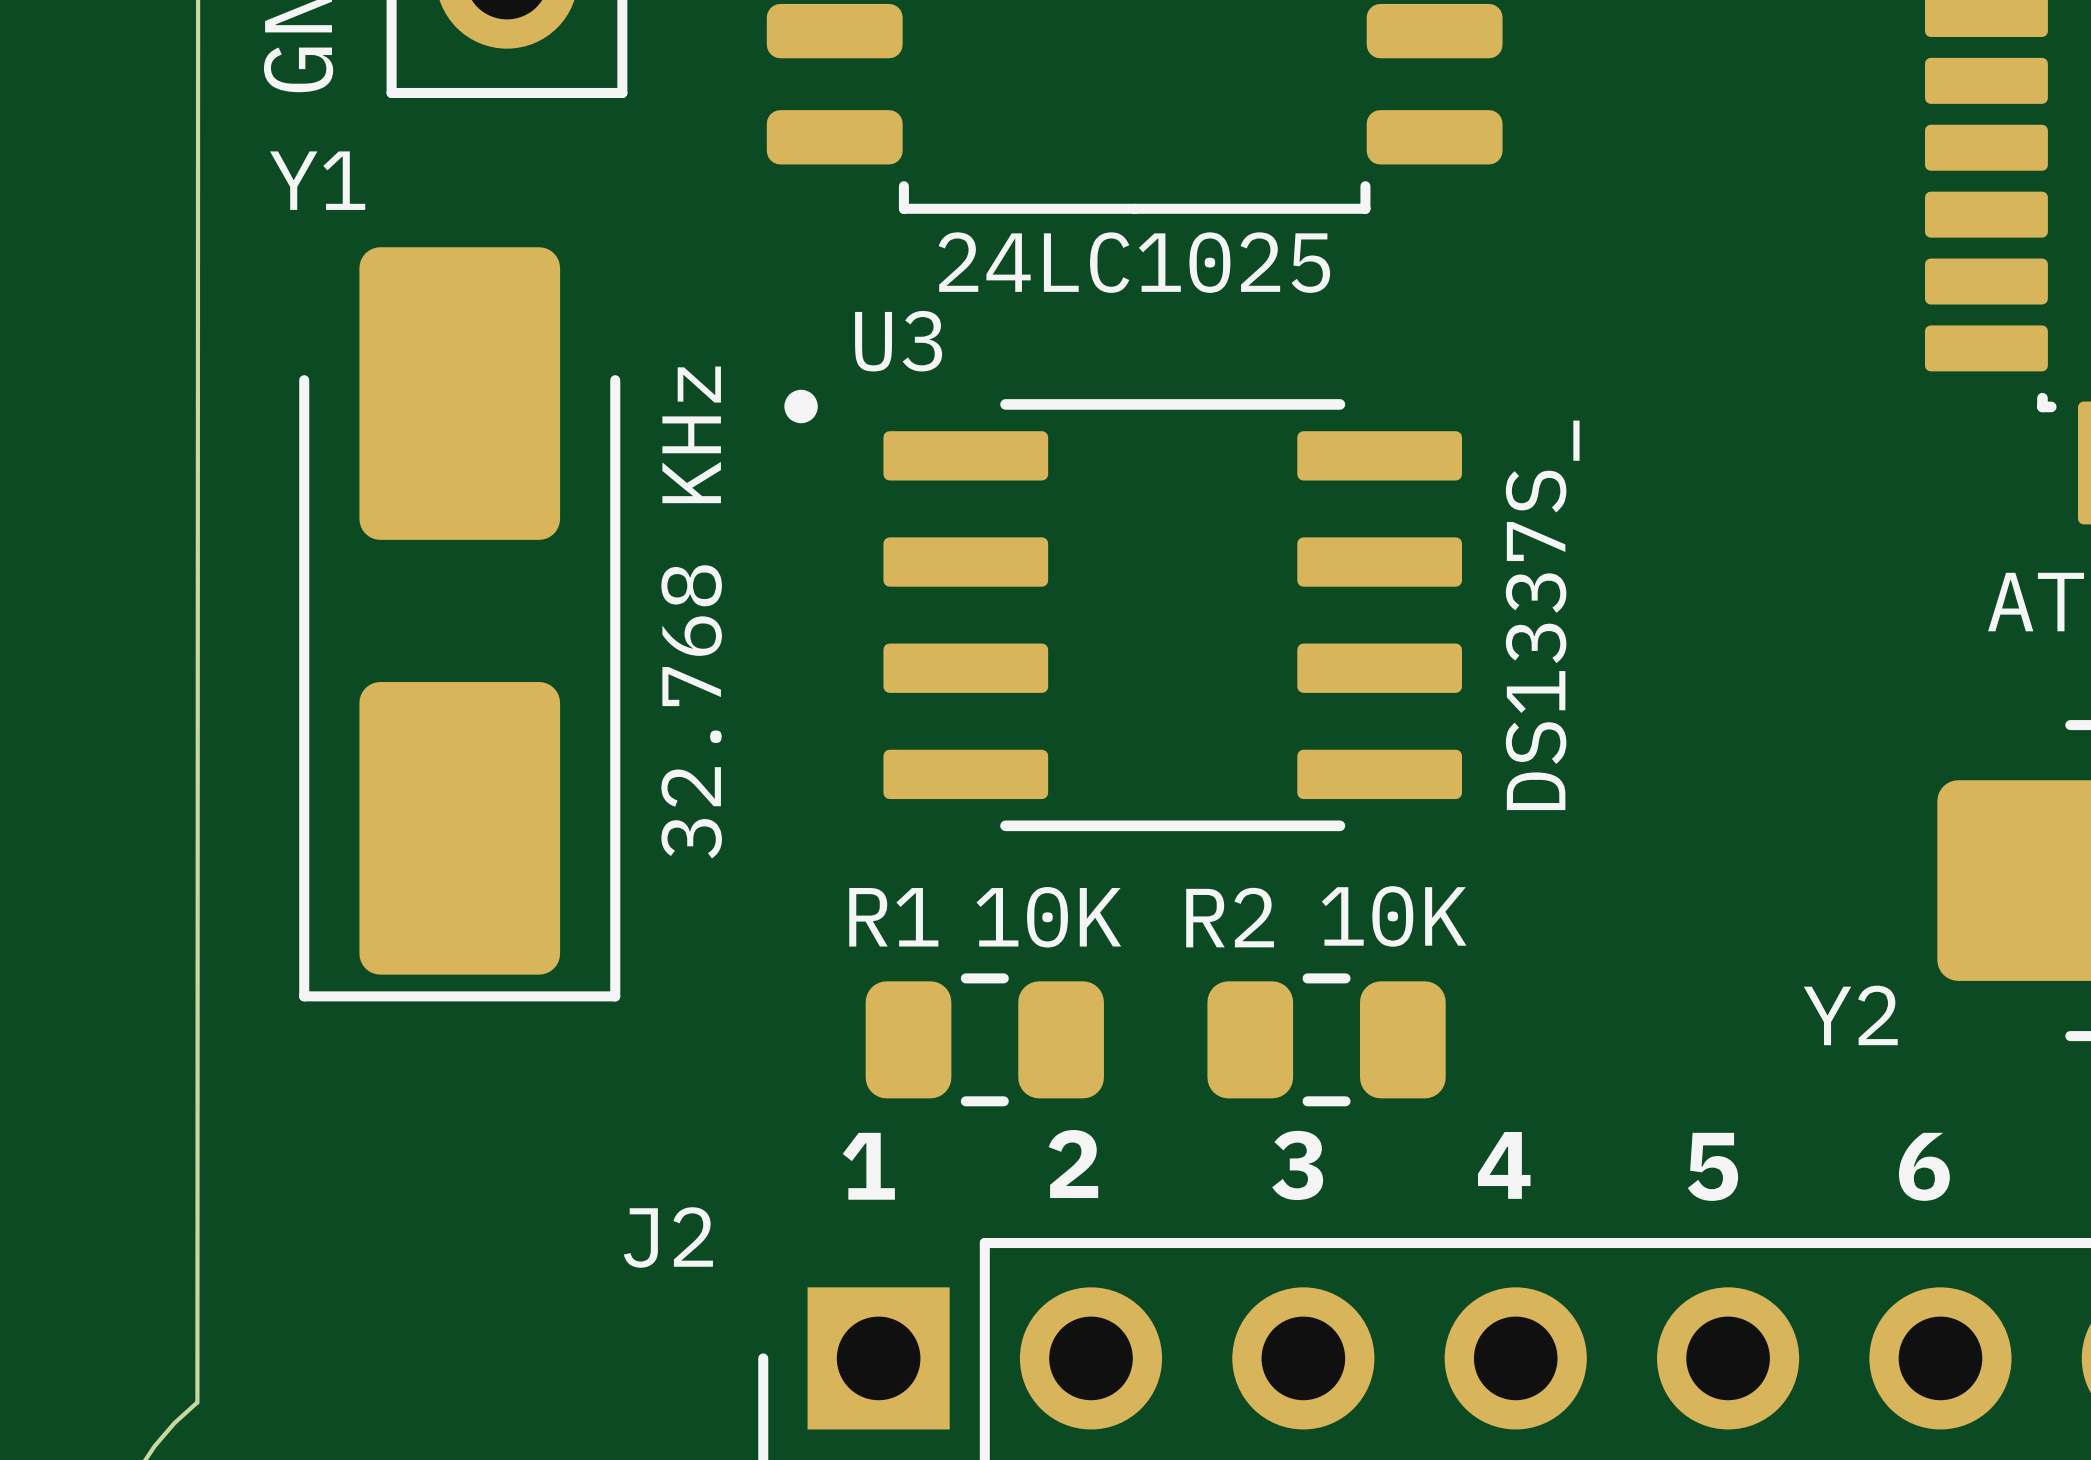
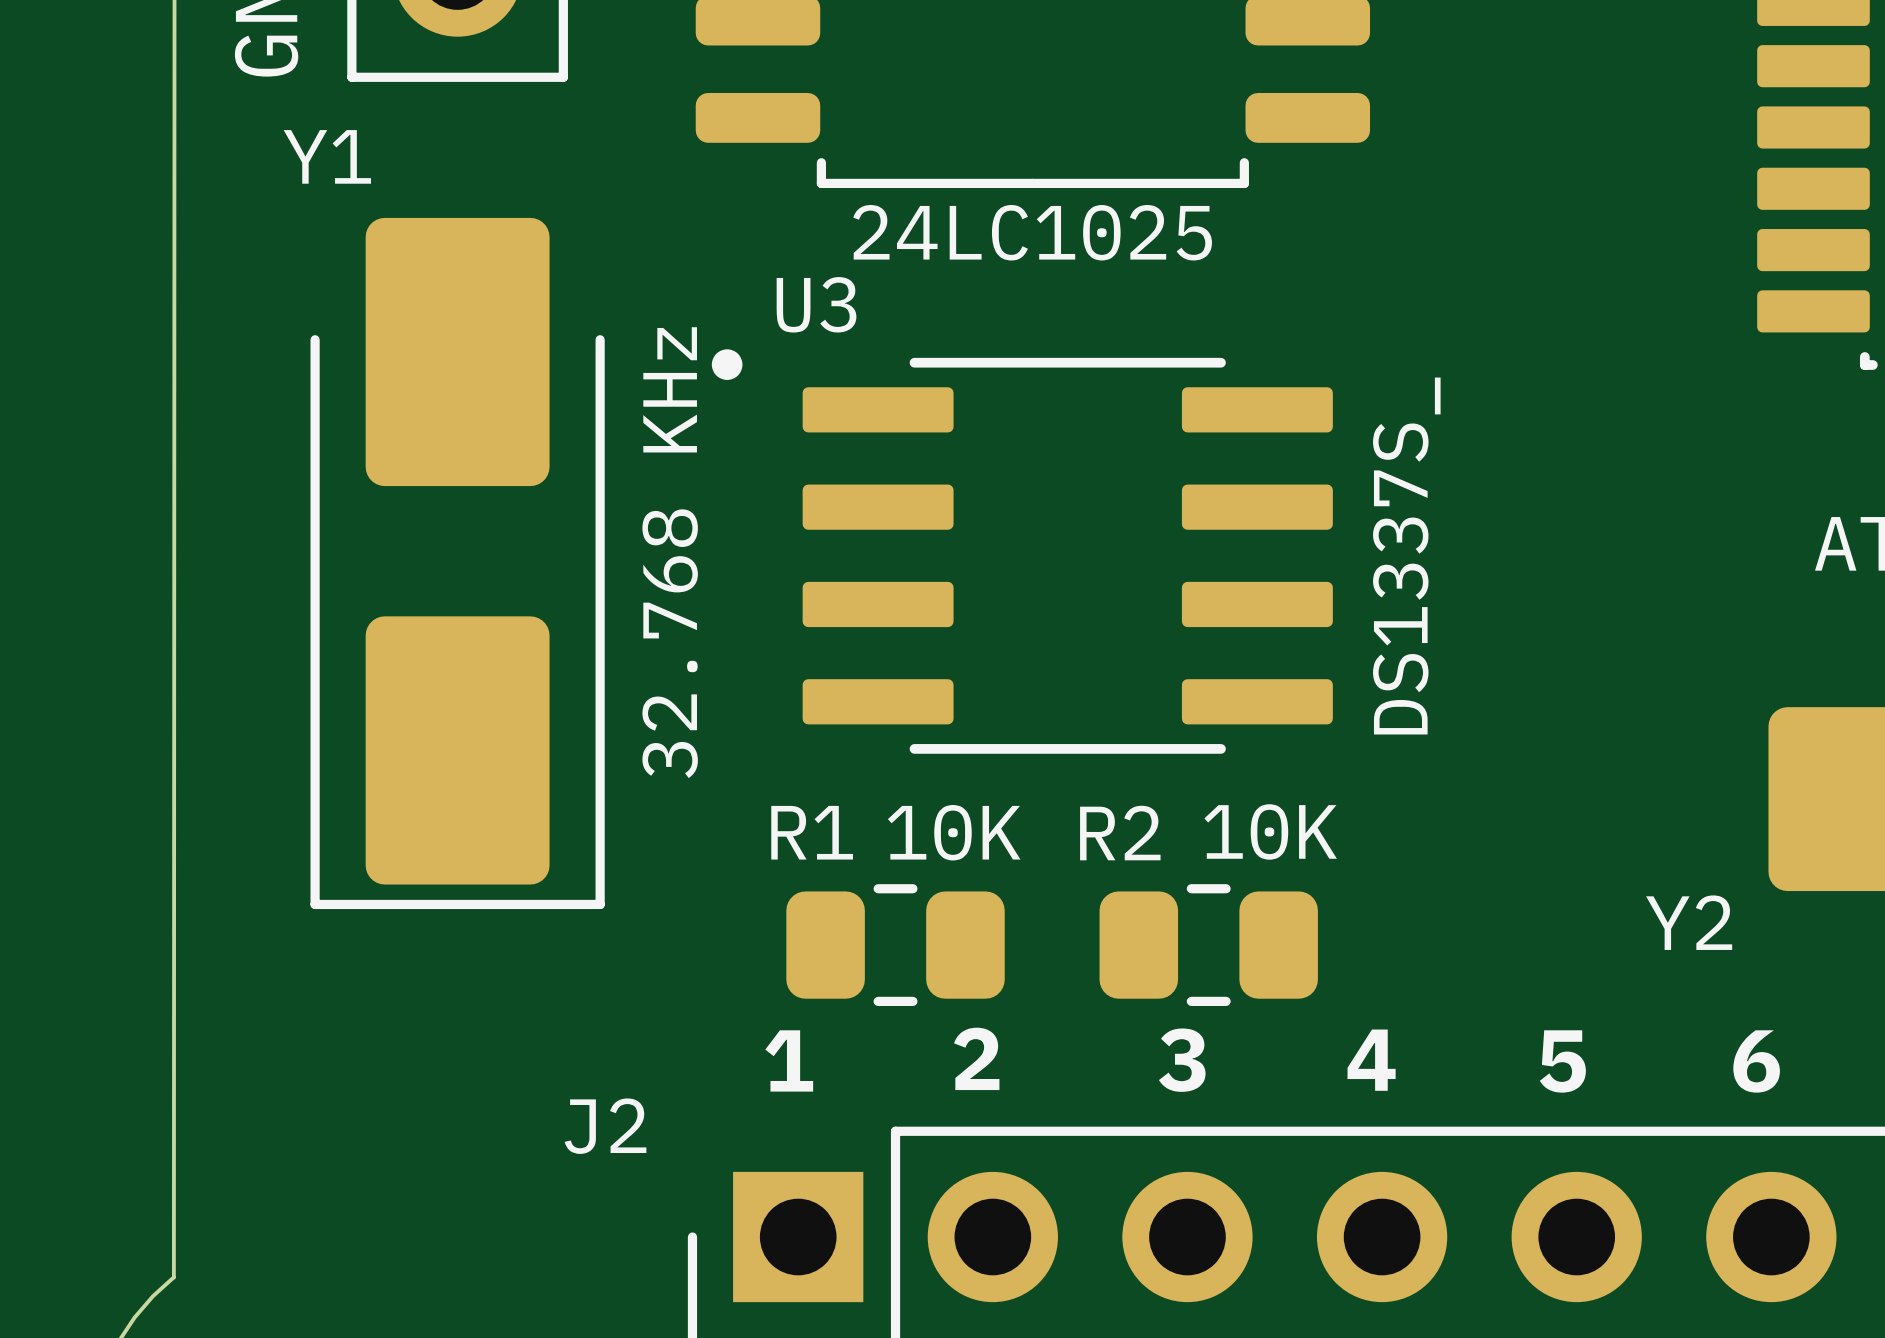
Y1 position: (459, 624) -> (457, 563)

